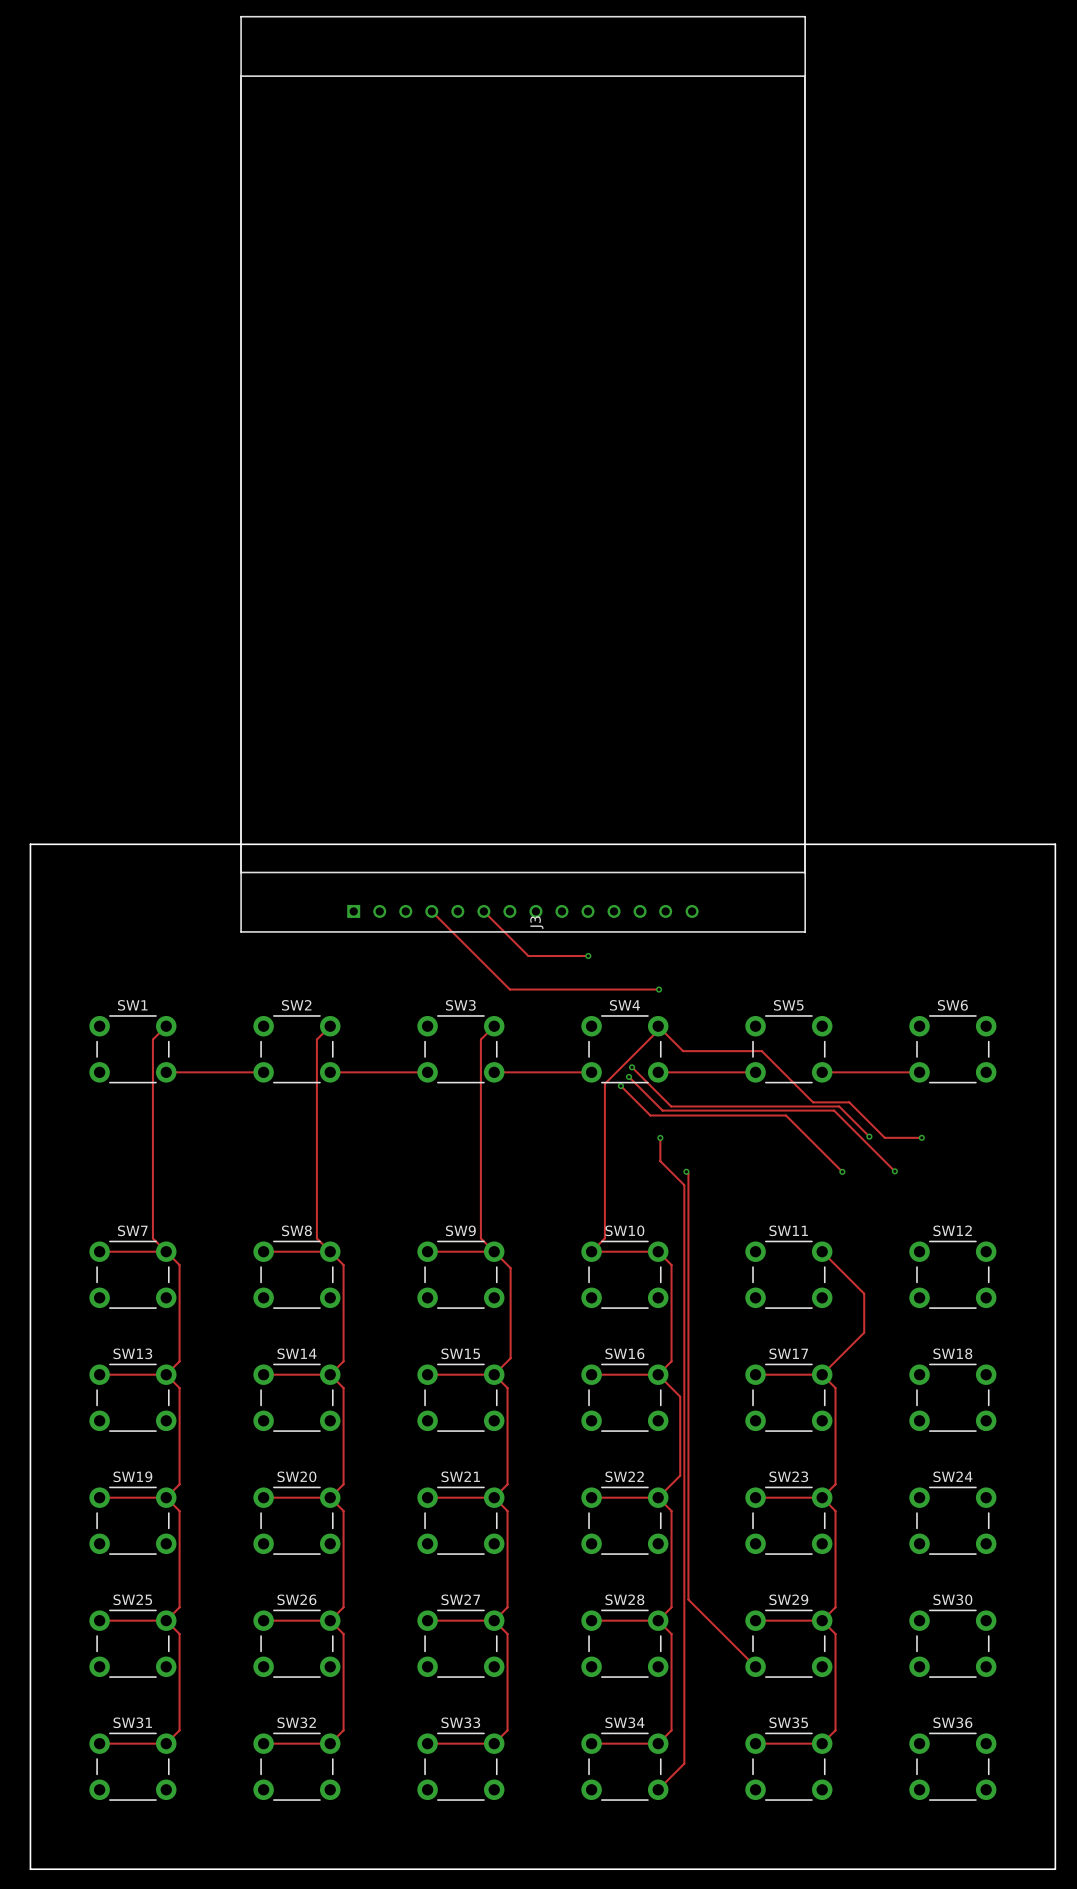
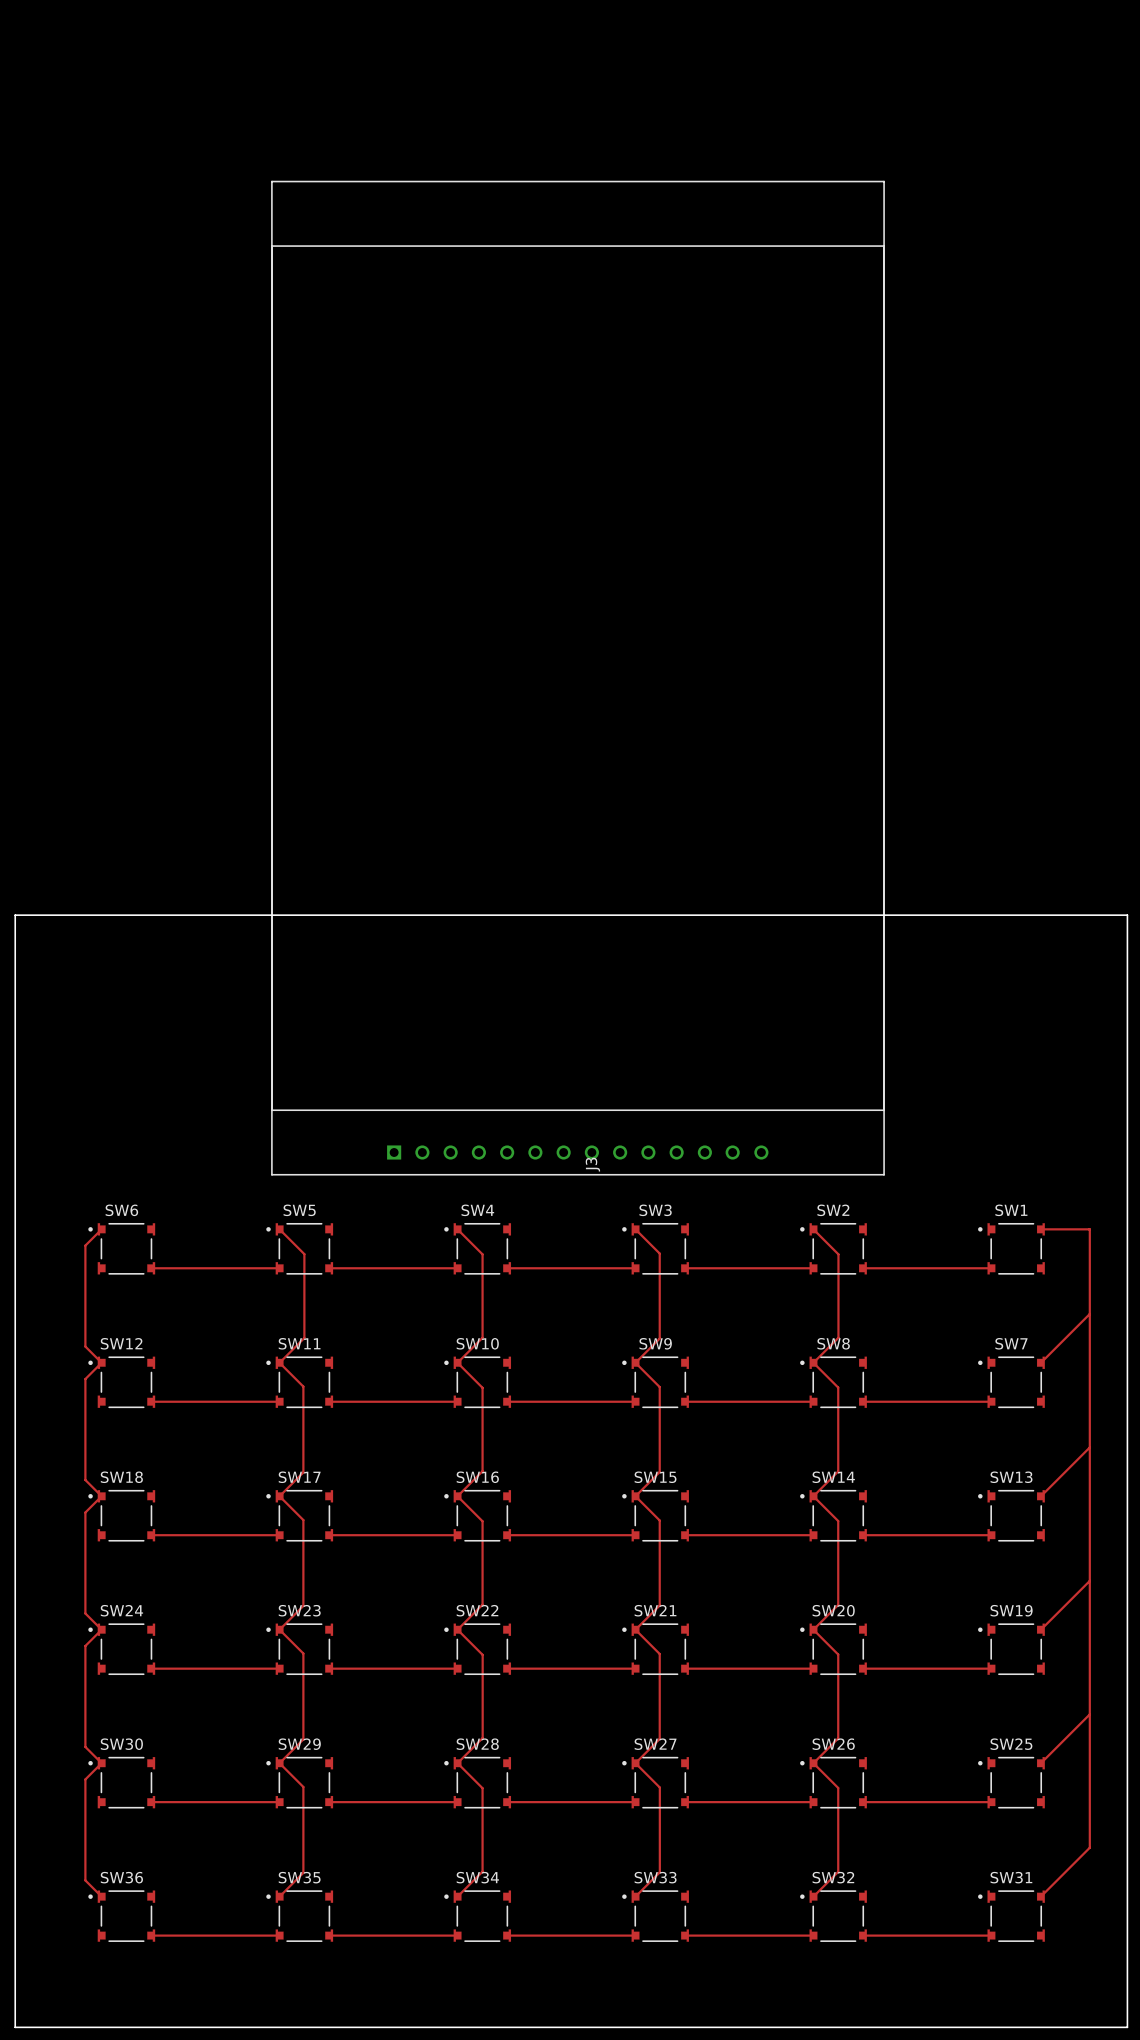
line: (241, 16) (805, 16) (805, 931) (241, 931) (241, 16) -> (271, 181) (884, 181) (884, 1174) (271, 1174) (271, 181)
line: (241, 76) (805, 76) -> (271, 246) (884, 246)
line: (241, 872) (805, 872) -> (271, 1110) (884, 1110)
track: (431, 911) (509, 989) (659, 989) -> none
track: (483, 911) (528, 956) (588, 956) -> none
J3 position: (522, 911) -> (577, 1152)
via: (588, 956) -> none
via: (659, 989) -> none
SW1 footprint: [89, 1015, 177, 1084] -> [978, 1223, 1045, 1275]
SW2 footprint: [253, 1015, 341, 1084] -> [800, 1223, 867, 1275]
SW3 footprint: [417, 1015, 505, 1084] -> [622, 1223, 689, 1275]
SW4 footprint: [581, 1015, 669, 1084] -> [444, 1223, 512, 1275]
SW5 footprint: [745, 1015, 833, 1084] -> [266, 1223, 334, 1275]
SW6 footprint: [909, 1015, 997, 1084] -> [88, 1223, 156, 1275]
track: (166, 1026) (152, 1039) (152, 1238) (179, 1265) (179, 1361) (166, 1374) -> none
track: (330, 1026) (316, 1039) (316, 1238) (343, 1265) (343, 1361) (330, 1374) -> none
track: (494, 1026) (480, 1039) (480, 1238) (510, 1268) (510, 1358) (494, 1374) -> none
track: (632, 1067) (671, 1106) (839, 1106) (869, 1136) -> none
via: (632, 1067) -> none
track: (166, 1072) (263, 1072) -> none
track: (330, 1072) (427, 1072) -> none
track: (494, 1072) (591, 1072) -> none
track: (658, 1072) (755, 1072) -> none
track: (822, 1072) (919, 1072) -> none
track: (628, 1076) (662, 1110) (834, 1110) (894, 1171) -> none
via: (628, 1076) -> none
track: (620, 1085) (650, 1115) (786, 1115) (842, 1171) -> none
via: (620, 1085) -> none
track: none -> (101, 1229) (85, 1245) (85, 1346) (101, 1362) (85, 1379) (85, 1480) (101, 1496) (85, 1512) (85, 1613) (101, 1629) (85, 1645) (85, 1746) (101, 1763) (85, 1779) (85, 1880) (101, 1896)
track: none -> (279, 1229) (304, 1254) (304, 1338) (279, 1362) (303, 1386) (303, 1472) (279, 1496) (303, 1520) (303, 1605) (279, 1629) (303, 1653) (303, 1739) (279, 1763) (303, 1787) (303, 1872) (279, 1896)
track: none -> (457, 1229) (482, 1254) (482, 1337) (457, 1362) (482, 1387) (482, 1471) (457, 1496) (482, 1521) (482, 1604) (457, 1629) (482, 1654) (482, 1738) (457, 1763) (482, 1788) (482, 1871) (457, 1896)
track: none -> (635, 1229) (659, 1253) (659, 1338) (635, 1362) (659, 1387) (659, 1472) (635, 1496) (659, 1520) (659, 1605) (635, 1629) (659, 1653) (659, 1738) (635, 1763) (659, 1787) (659, 1872) (635, 1896)
track: none -> (813, 1229) (838, 1254) (838, 1337) (813, 1362) (838, 1387) (838, 1471) (813, 1496) (838, 1521) (838, 1604) (813, 1629) (838, 1654) (838, 1738) (813, 1763) (838, 1788) (838, 1871) (813, 1896)
track: none -> (1040, 1229) (1089, 1229)
track: none -> (1089, 1229) (1089, 1847) (1040, 1896)
via: (869, 1136) -> none
track: (660, 1137) (660, 1161) (684, 1185) (684, 1763) (658, 1789) -> none
via: (660, 1137) -> none
track: (921, 1137) (884, 1137) (849, 1102) (813, 1102) (761, 1051) (683, 1051) (658, 1026) (658, 1030) (604, 1083) (604, 1238) (591, 1251) (658, 1251) (671, 1265) (671, 1361) (658, 1374) -> none
via: (921, 1137) -> none
track: none -> (151, 1268) (279, 1268)
track: none -> (329, 1268) (457, 1268)
track: none -> (507, 1268) (635, 1268)
track: none -> (685, 1268) (813, 1268)
track: none -> (863, 1268) (991, 1268)
track: (686, 1171) (688, 1173) (688, 1599) (755, 1666) -> none
via: (686, 1171) -> none
via: (842, 1171) -> none
via: (894, 1171) -> none
track: none -> (1089, 1313) (1040, 1362)
SW7 footprint: [89, 1240, 177, 1309] -> [978, 1356, 1045, 1409]
SW8 footprint: [253, 1240, 341, 1309] -> [800, 1356, 867, 1409]
SW9 footprint: [417, 1240, 505, 1309] -> [622, 1356, 689, 1409]
SW10 footprint: [581, 1240, 669, 1309] -> [444, 1356, 512, 1409]
SW11 footprint: [745, 1240, 833, 1309] -> [266, 1356, 334, 1409]
SW12 footprint: [909, 1240, 997, 1309] -> [88, 1356, 156, 1409]
track: (99, 1251) (166, 1251) -> none
track: (263, 1251) (330, 1251) -> none
track: (427, 1251) (494, 1251) -> none
track: (822, 1251) (864, 1293) (864, 1332) (822, 1374) -> none
track: none -> (151, 1401) (279, 1401)
track: none -> (329, 1401) (457, 1401)
track: none -> (507, 1401) (635, 1401)
track: none -> (685, 1401) (813, 1401)
track: none -> (863, 1401) (991, 1401)
track: none -> (1089, 1447) (1040, 1496)
SW13 footprint: [89, 1363, 177, 1432] -> [978, 1490, 1045, 1542]
SW14 footprint: [253, 1363, 341, 1432] -> [800, 1490, 867, 1542]
SW15 footprint: [417, 1363, 505, 1432] -> [622, 1490, 689, 1542]
SW16 footprint: [581, 1363, 669, 1432] -> [444, 1490, 512, 1542]
SW17 footprint: [745, 1363, 833, 1432] -> [266, 1490, 334, 1542]
SW18 footprint: [909, 1363, 997, 1432] -> [88, 1490, 156, 1542]
track: (99, 1374) (166, 1374) -> none
track: (166, 1374) (179, 1388) (179, 1484) (166, 1497) -> none
track: (263, 1374) (330, 1374) -> none
track: (330, 1374) (343, 1388) (343, 1484) (330, 1497) -> none
track: (427, 1374) (494, 1374) -> none
track: (494, 1374) (507, 1388) (507, 1484) (494, 1497) -> none
track: (591, 1374) (658, 1374) -> none
track: (658, 1374) (680, 1396) (680, 1475) (658, 1497) -> none
track: (755, 1374) (822, 1374) -> none
track: (822, 1374) (835, 1388) (835, 1484) (822, 1497) -> none
track: none -> (151, 1535) (279, 1535)
track: none -> (329, 1535) (457, 1535)
track: none -> (507, 1535) (635, 1535)
track: none -> (685, 1535) (813, 1535)
track: none -> (863, 1535) (991, 1535)
track: none -> (1089, 1580) (1040, 1629)
SW19 footprint: [89, 1486, 177, 1555] -> [978, 1623, 1045, 1675]
SW20 footprint: [253, 1486, 341, 1555] -> [800, 1623, 867, 1675]
SW21 footprint: [417, 1486, 505, 1555] -> [622, 1623, 689, 1675]
SW22 footprint: [581, 1486, 669, 1555] -> [444, 1623, 512, 1675]
SW23 footprint: [745, 1486, 833, 1555] -> [266, 1623, 334, 1675]
SW24 footprint: [909, 1486, 997, 1555] -> [88, 1623, 156, 1675]
track: (99, 1497) (166, 1497) -> none
track: (166, 1497) (179, 1511) (179, 1607) (166, 1620) -> none
track: (263, 1497) (330, 1497) -> none
track: (330, 1497) (343, 1511) (343, 1607) (330, 1620) -> none
track: (427, 1497) (494, 1497) -> none
track: (494, 1497) (507, 1511) (507, 1607) (494, 1620) -> none
track: (591, 1497) (658, 1497) -> none
track: (658, 1497) (671, 1511) (671, 1607) (658, 1620) -> none
track: (755, 1497) (822, 1497) -> none
track: (822, 1497) (835, 1511) (835, 1607) (822, 1620) -> none
track: none -> (151, 1668) (279, 1668)
track: none -> (329, 1668) (457, 1668)
track: none -> (507, 1668) (635, 1668)
track: none -> (685, 1668) (813, 1668)
track: none -> (863, 1668) (991, 1668)
track: none -> (1089, 1714) (1040, 1763)
SW25 footprint: [89, 1609, 177, 1678] -> [978, 1756, 1045, 1809]
SW26 footprint: [253, 1609, 341, 1678] -> [800, 1756, 867, 1809]
SW27 footprint: [417, 1609, 505, 1678] -> [622, 1756, 689, 1809]
SW28 footprint: [581, 1609, 669, 1678] -> [444, 1756, 512, 1809]
SW29 footprint: [745, 1609, 833, 1678] -> [266, 1756, 334, 1809]
SW30 footprint: [909, 1609, 997, 1678] -> [88, 1756, 156, 1809]
track: (99, 1620) (166, 1620) -> none
track: (166, 1620) (179, 1634) (179, 1730) (166, 1743) (99, 1743) -> none
track: (263, 1620) (330, 1620) -> none
track: (330, 1620) (343, 1634) (343, 1730) (330, 1743) (263, 1743) -> none
track: (427, 1620) (494, 1620) -> none
track: (494, 1620) (507, 1634) (507, 1730) (494, 1743) (427, 1743) -> none
track: (591, 1620) (658, 1620) -> none
track: (658, 1620) (671, 1634) (671, 1730) (658, 1743) (591, 1743) -> none
track: (755, 1620) (822, 1620) -> none
track: (822, 1620) (835, 1634) (835, 1730) (822, 1743) (755, 1743) -> none
track: none -> (151, 1802) (279, 1802)
track: none -> (329, 1802) (457, 1802)
track: none -> (507, 1802) (635, 1802)
track: none -> (685, 1802) (813, 1802)
track: none -> (863, 1802) (991, 1802)
SW31 footprint: [89, 1732, 177, 1801] -> [978, 1890, 1045, 1942]
SW32 footprint: [253, 1732, 341, 1801] -> [800, 1890, 867, 1942]
SW33 footprint: [417, 1732, 505, 1801] -> [622, 1890, 689, 1942]
SW34 footprint: [581, 1732, 669, 1801] -> [444, 1890, 512, 1942]
SW35 footprint: [745, 1732, 833, 1801] -> [266, 1890, 334, 1942]
SW36 footprint: [909, 1732, 997, 1801] -> [88, 1890, 156, 1942]
track: none -> (151, 1935) (279, 1935)
track: none -> (329, 1935) (457, 1935)
track: none -> (507, 1935) (635, 1935)
track: none -> (685, 1935) (813, 1935)
track: none -> (863, 1935) (991, 1935)

